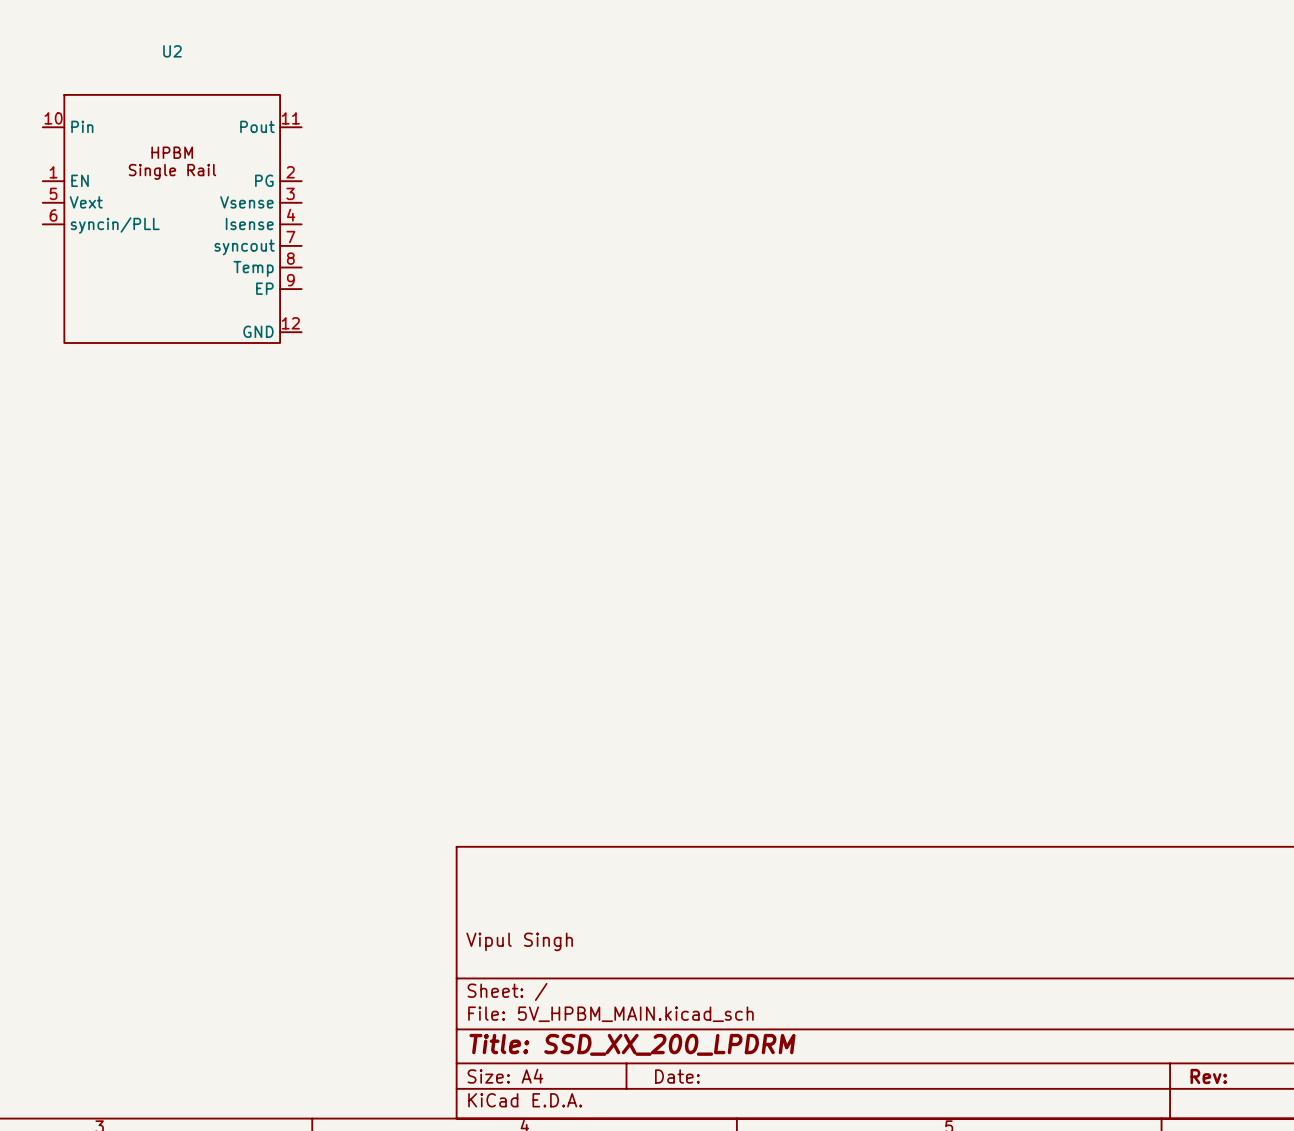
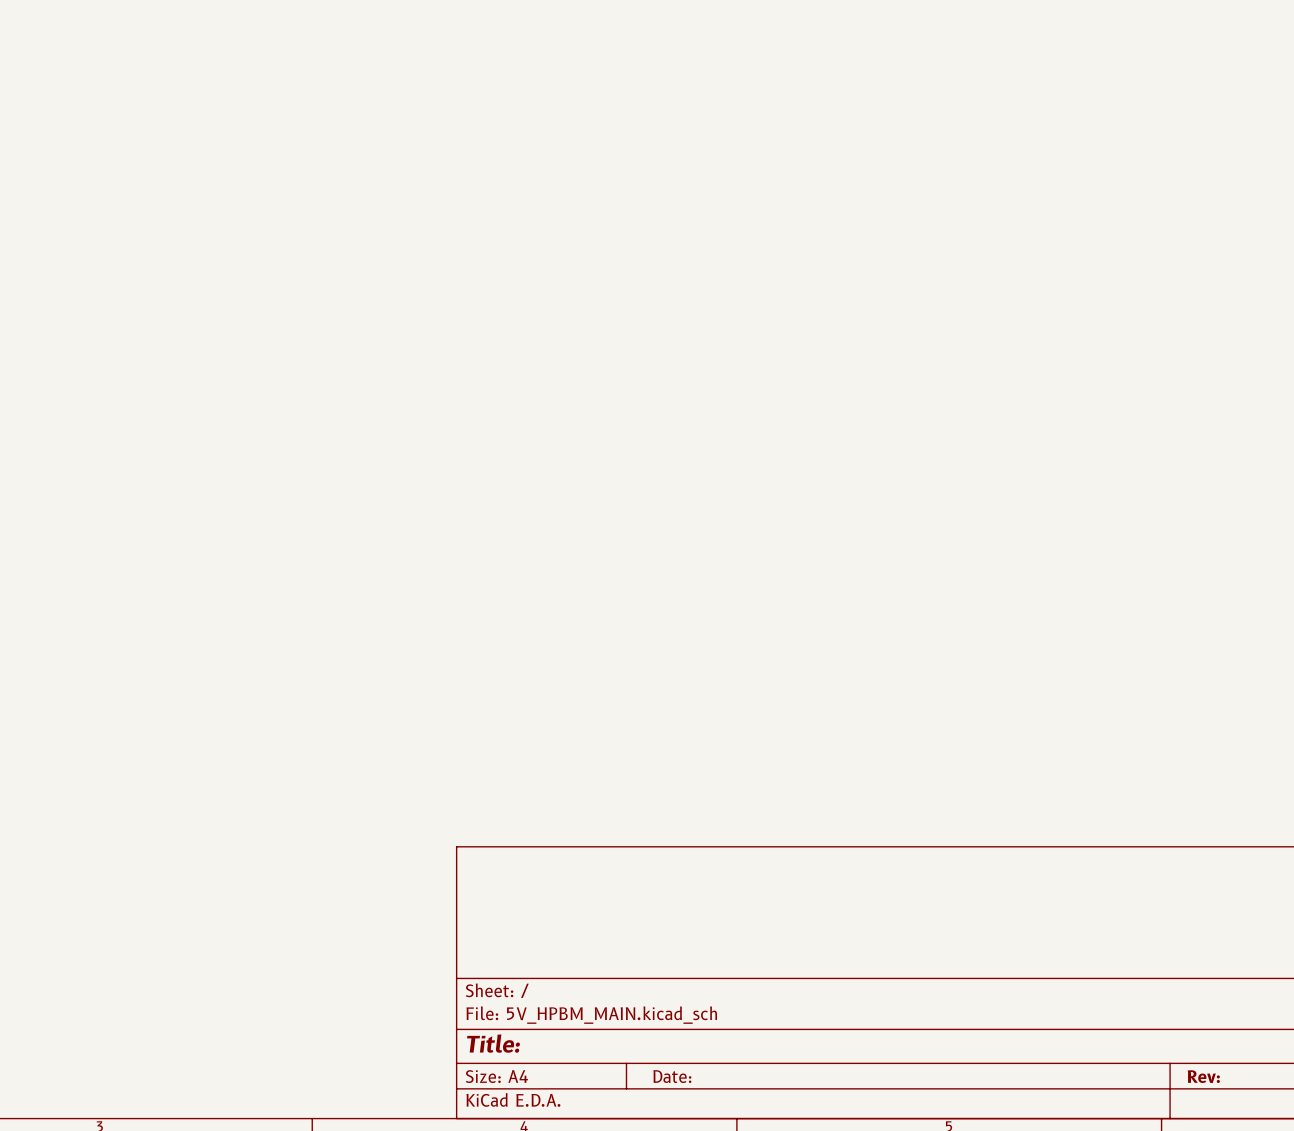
U2: (172, 218) -> none
title block: Vipul Singh (519, 941) -> none
title block: Title: SSD_XX_200_LPDRM (632, 1044) -> Title: (493, 1043)

